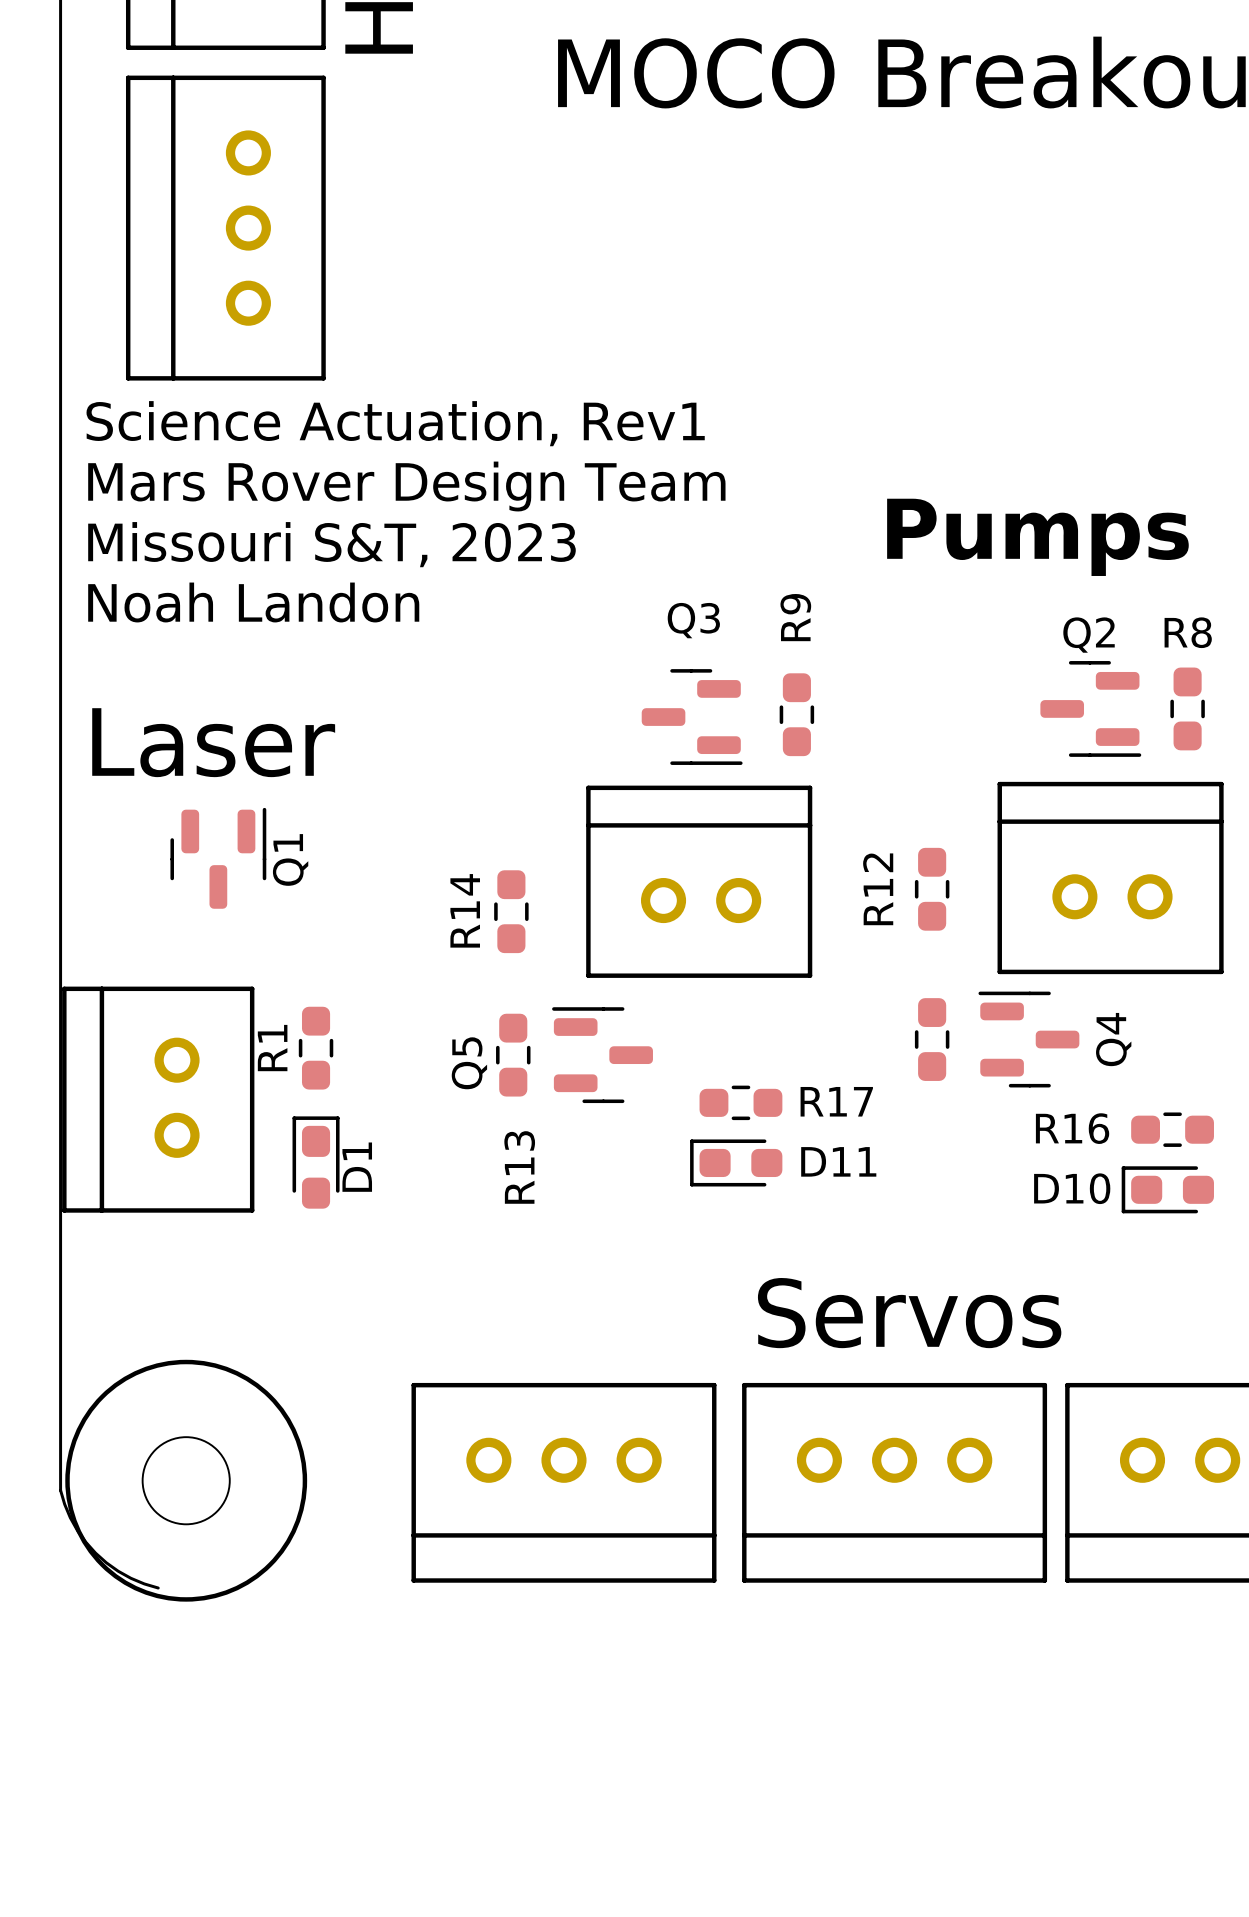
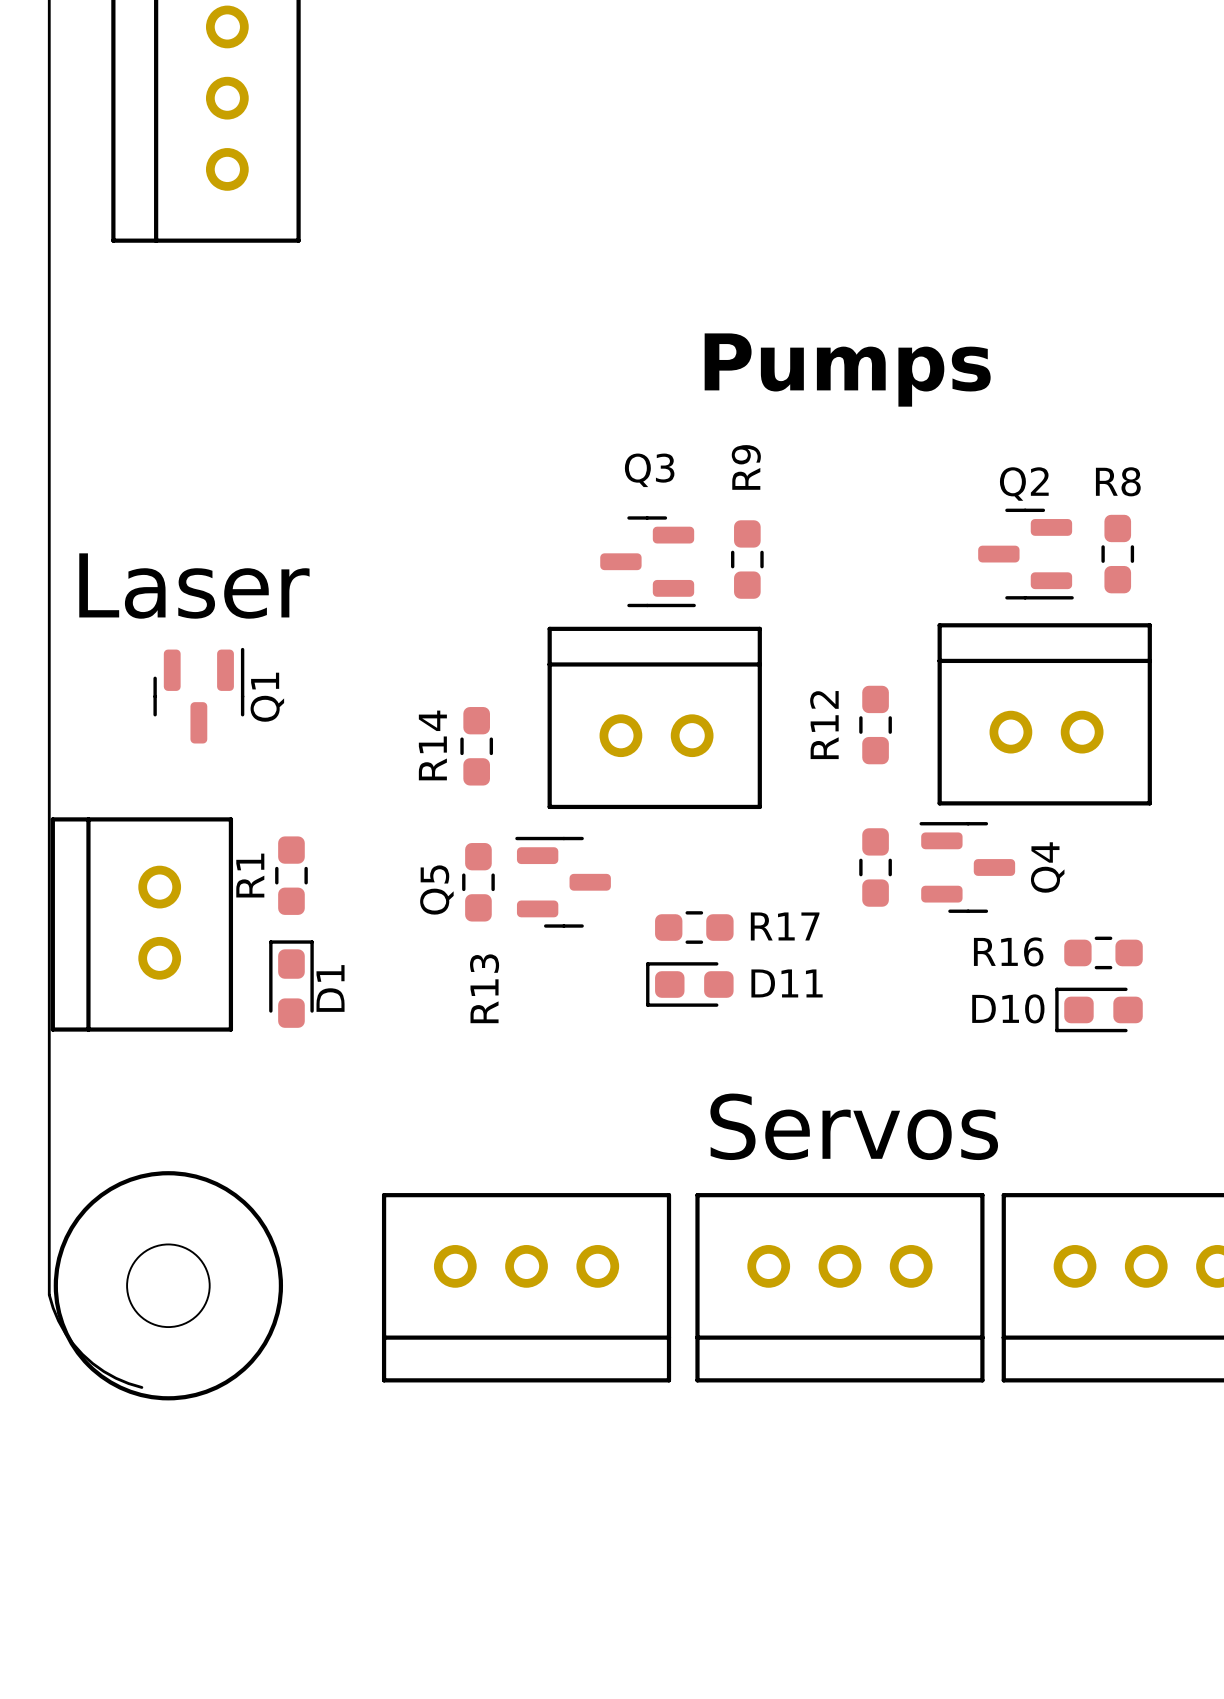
text: Science Actuation, Rev1 (395, 423) -> none
text: Mars Rover Design Team (406, 486) -> none
text position: Pumps (1037, 537) -> Pumps (847, 370)
text: Missouri S&T, 2023 (331, 544) -> none
text: Noah Landon (253, 602) -> none

